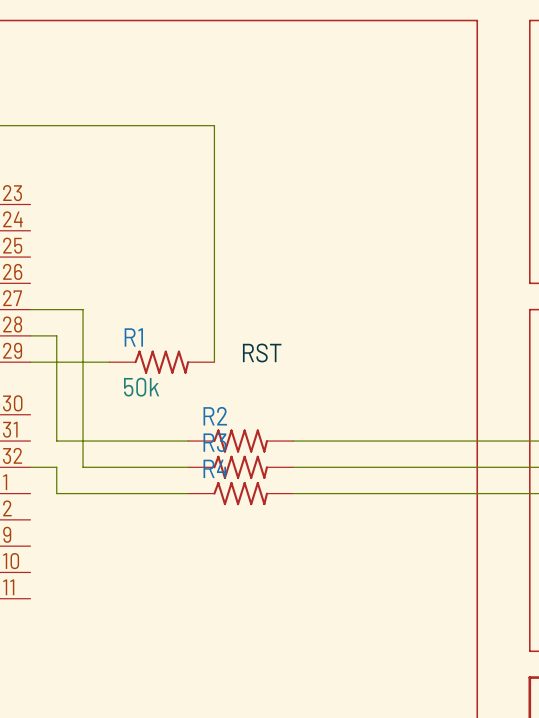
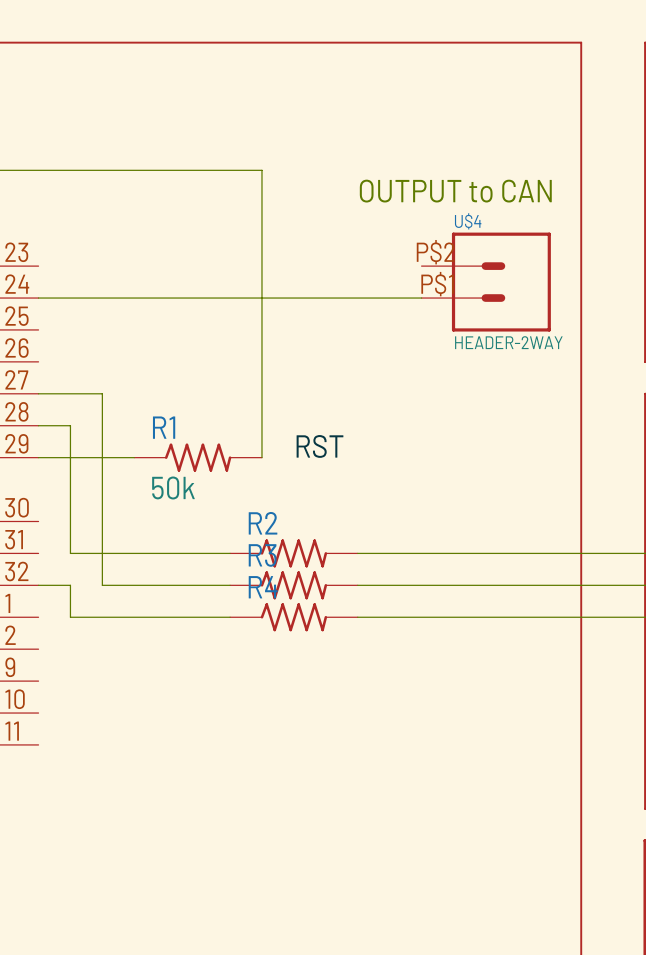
text: none -> OUTPUT to CAN (455, 191)
U$4: none -> HEADER-2WAY (486, 282)
wire: none -> (38, 298) (421, 298)

